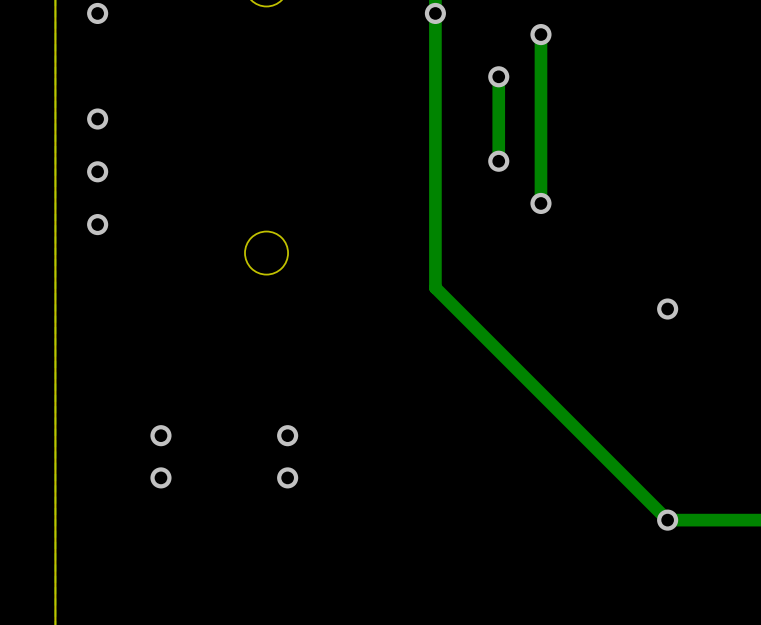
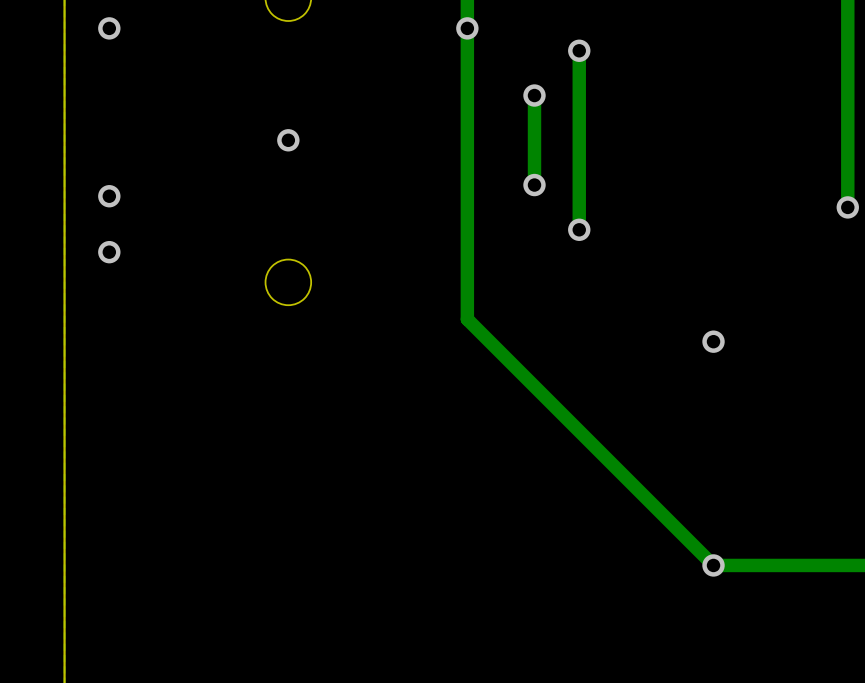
via: (97, 119) -> none
via: none -> (288, 140)
via: (160, 435) -> none
via: (287, 435) -> none
via: (160, 477) -> none
via: (287, 477) -> none

